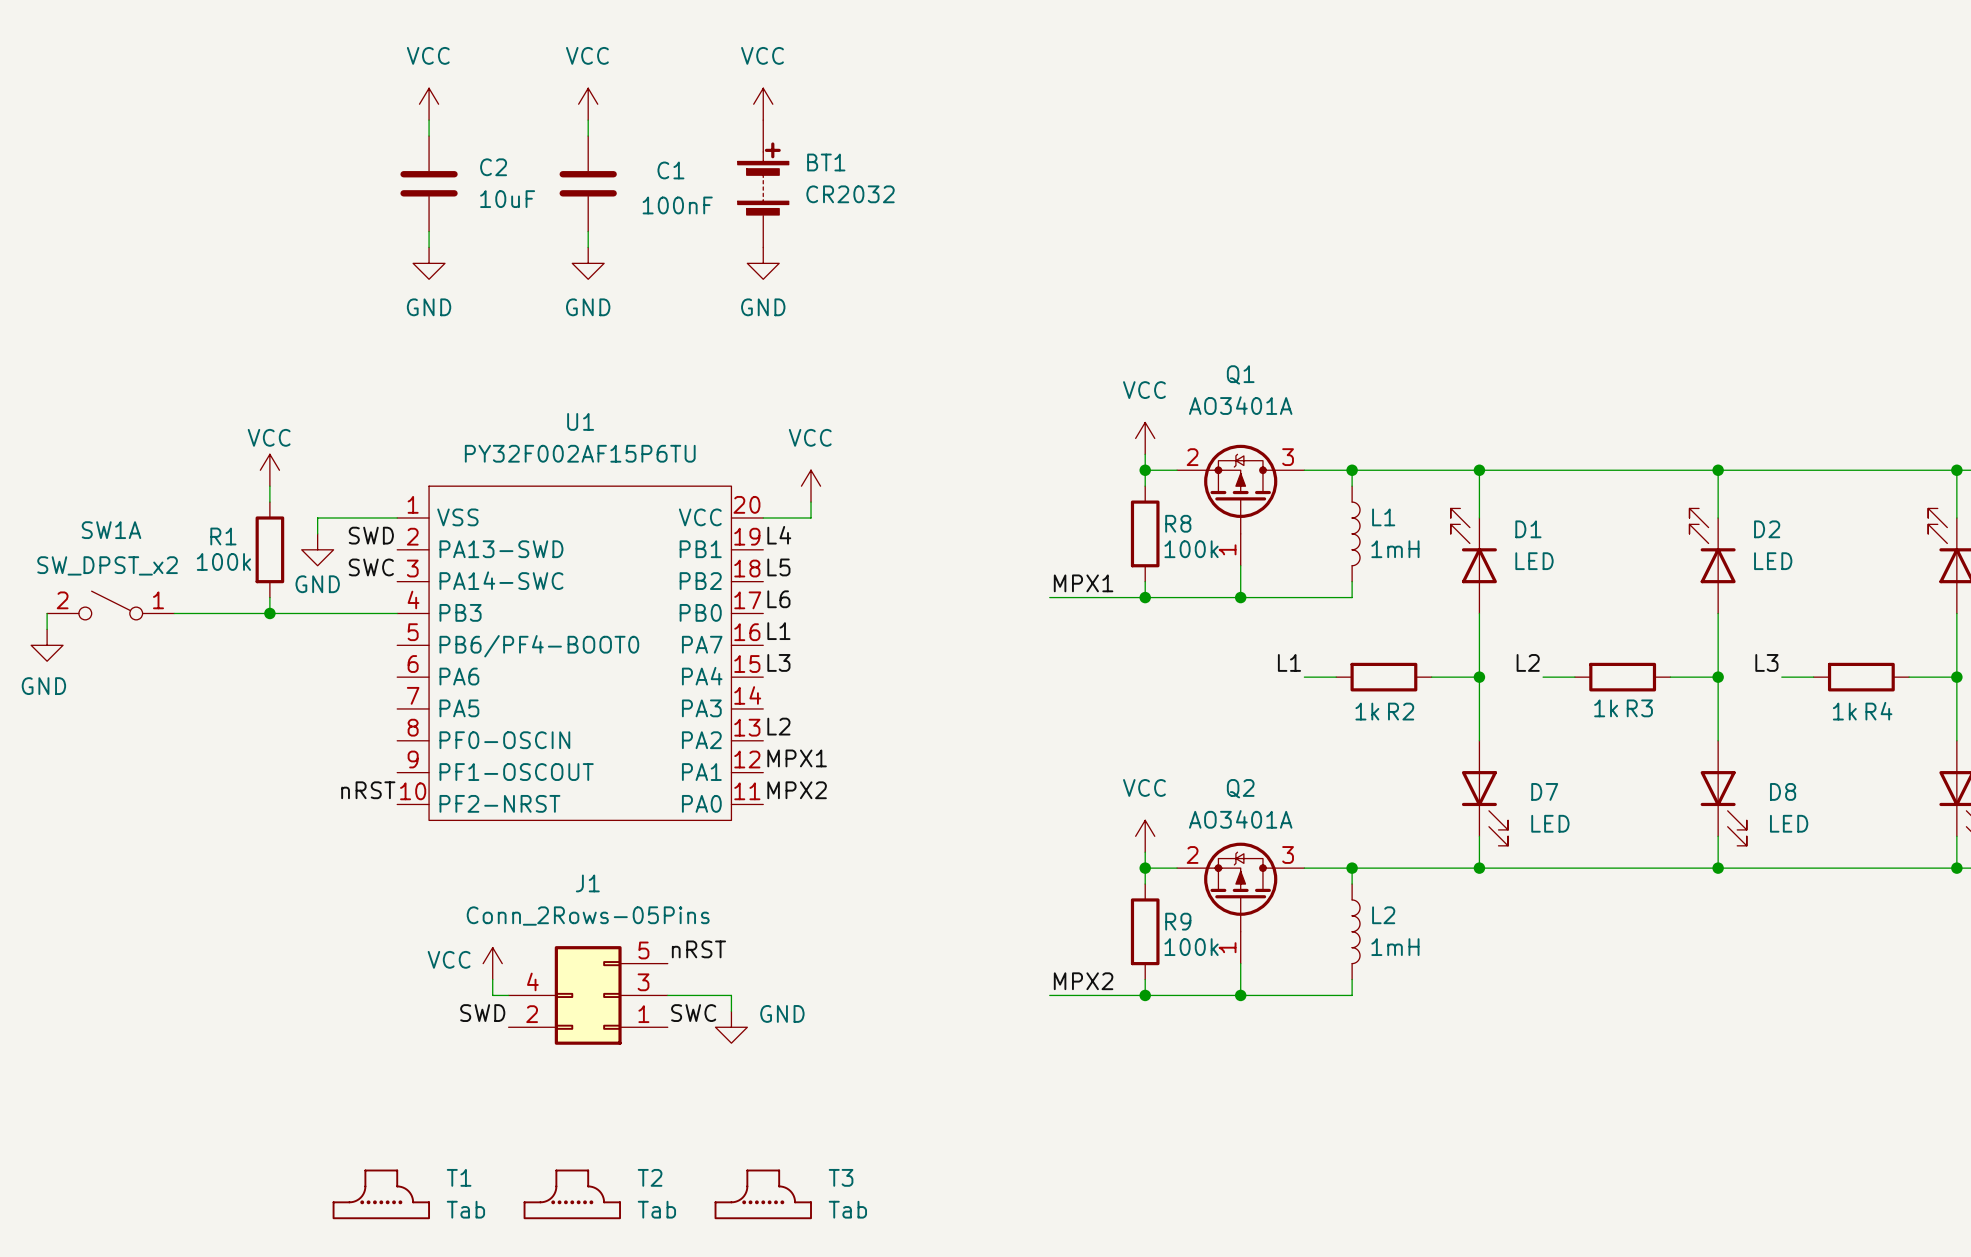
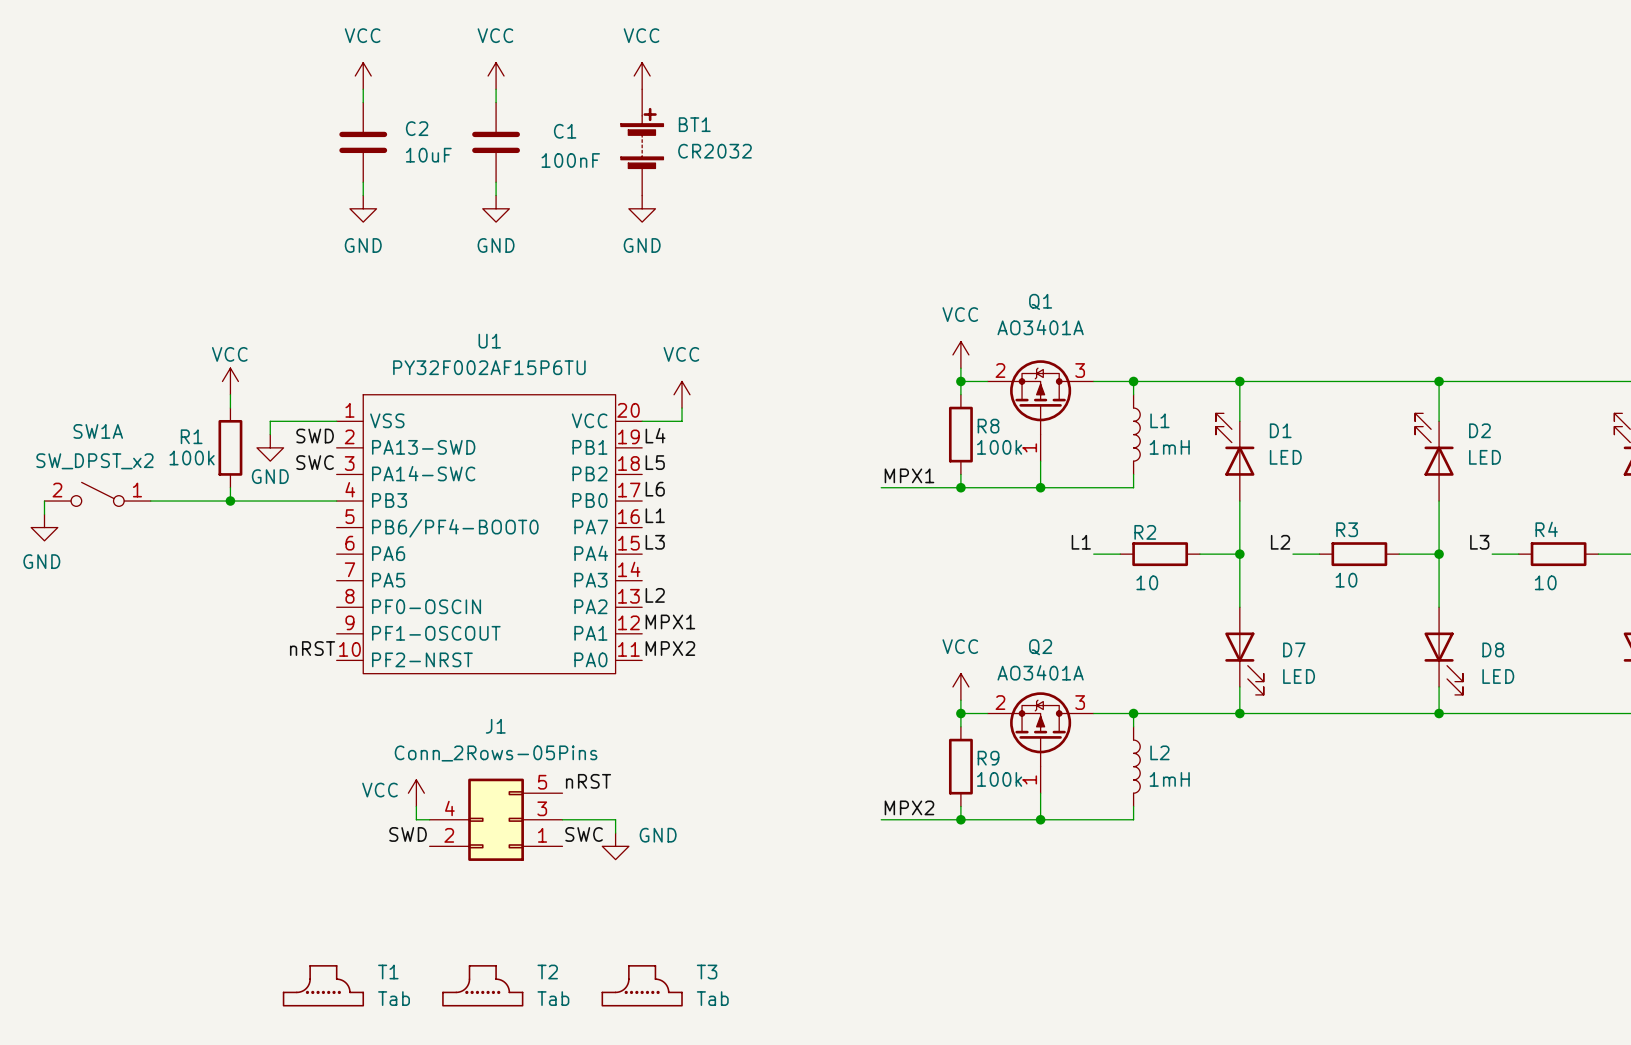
R3 value: 1k (1606, 708) -> 10 (1346, 580)
R3 name position: R3 (1639, 708) -> R3 (1347, 529)
R2 value: 1k (1367, 711) -> 10 (1147, 582)
R2 name position: R2 (1401, 711) -> R2 (1145, 532)
R4 value: 1k (1844, 711) -> 10 (1545, 582)
R4 name position: R4 (1878, 711) -> R4 (1546, 529)

